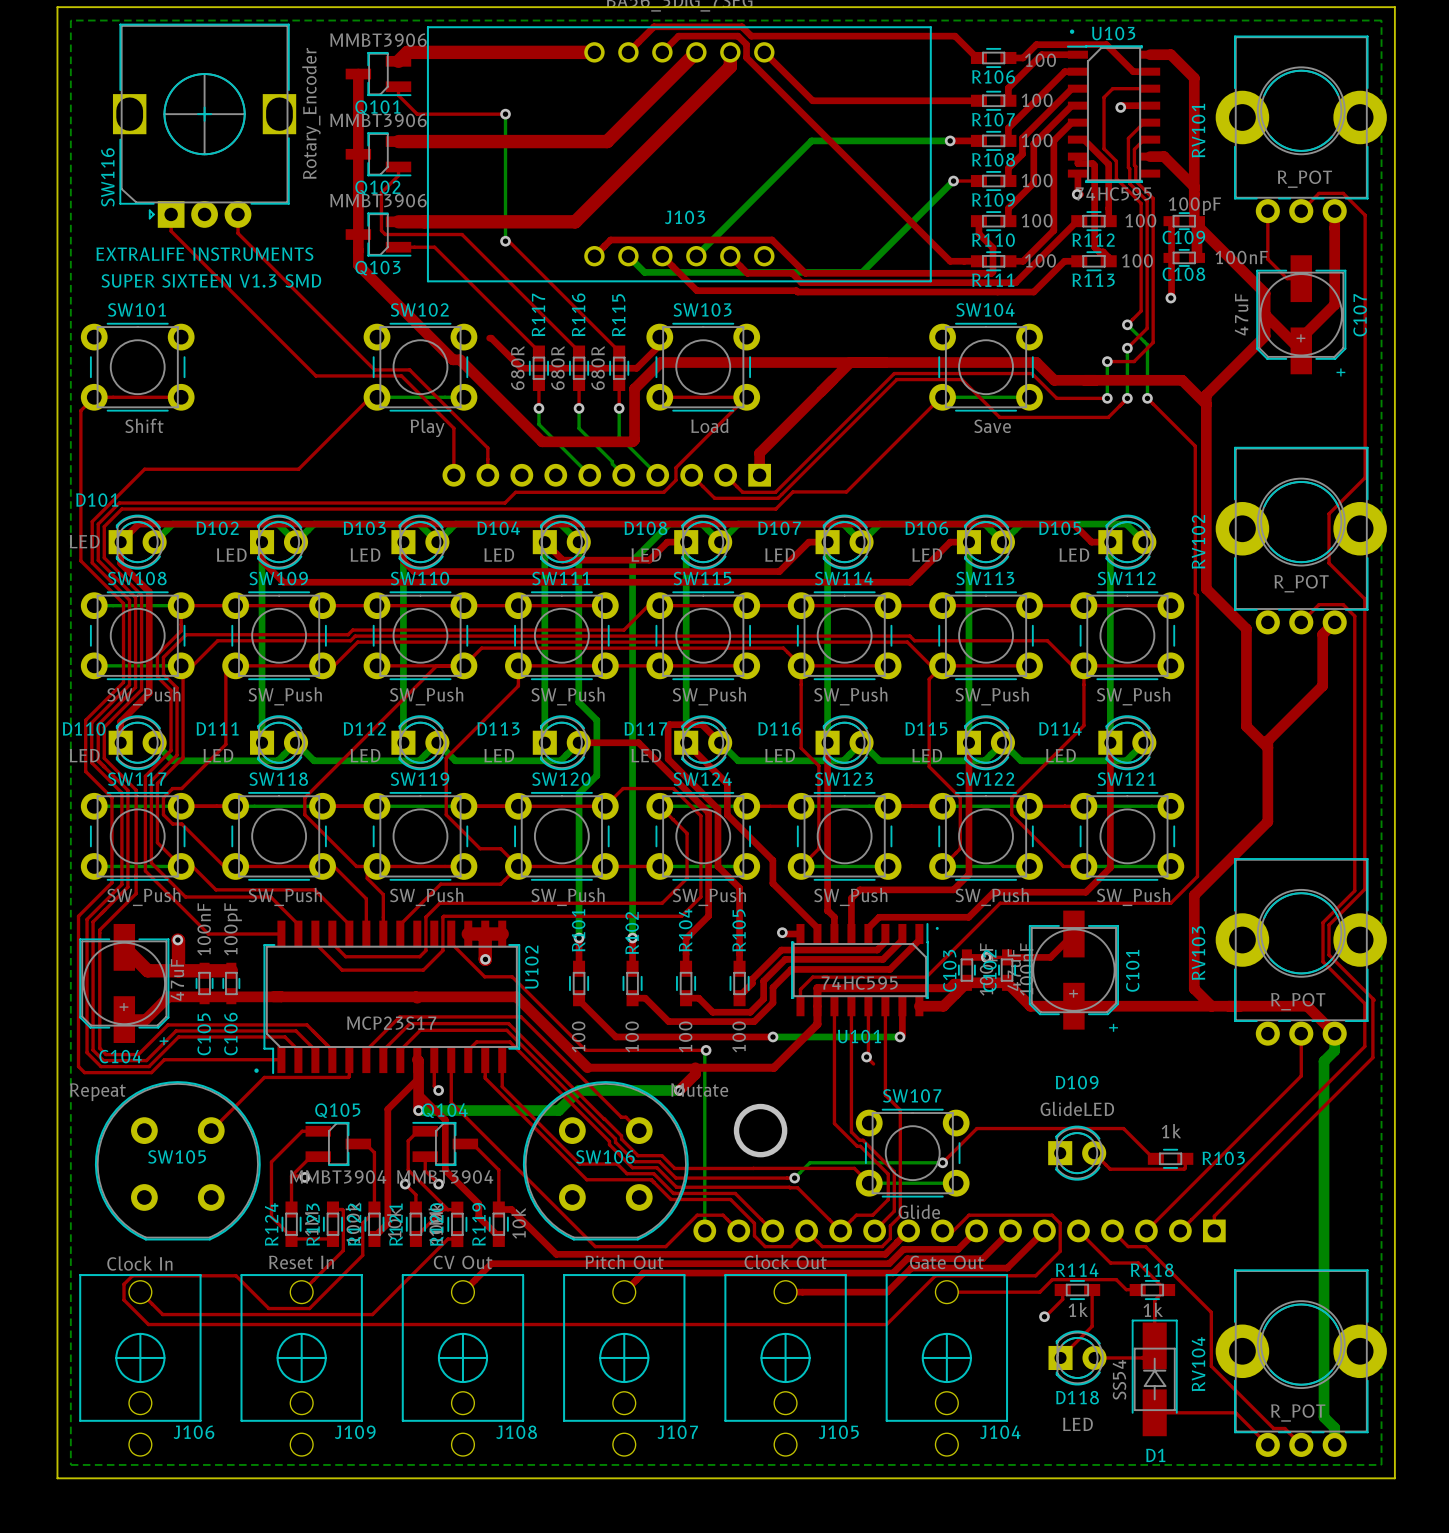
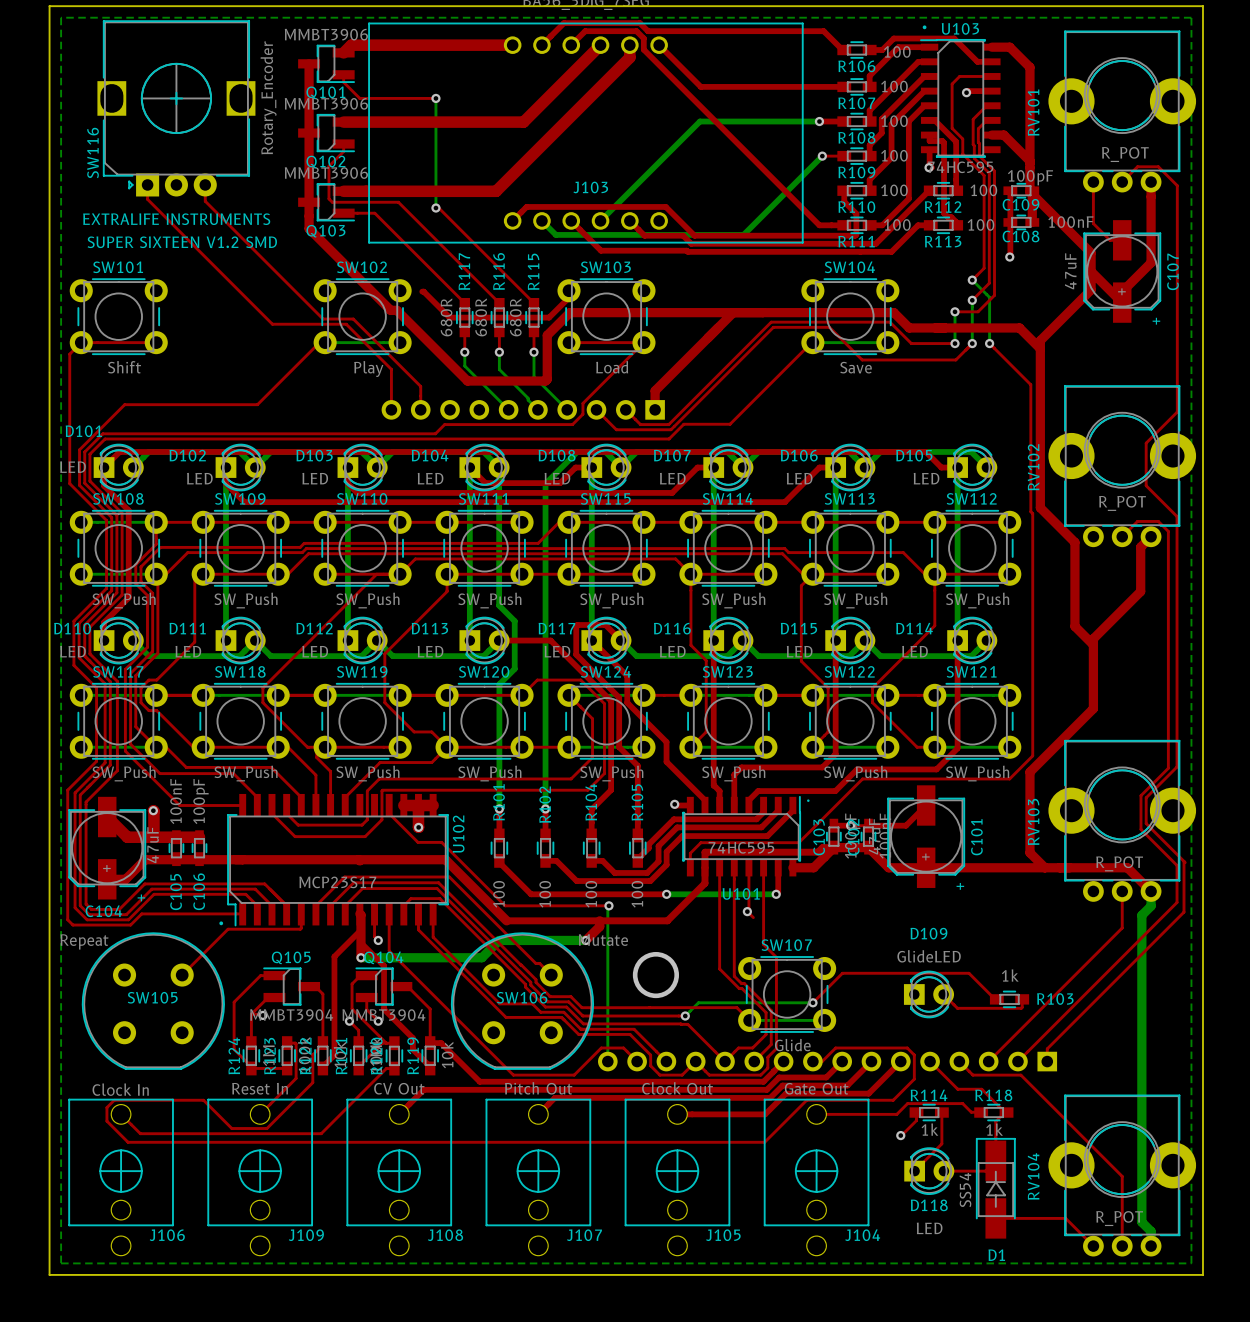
text: SUPER SIXTEEN V1.3 SMD (211, 280) -> SUPER SIXTEEN V1.2 SMD (182, 242)
top track: (1145, 1246) (1211, 1312) (1211, 1366) (1273, 1428) (1284, 1428) (1301, 1444) -> (987, 1075) (1020, 1075) (1122, 1176) (1122, 1246)

